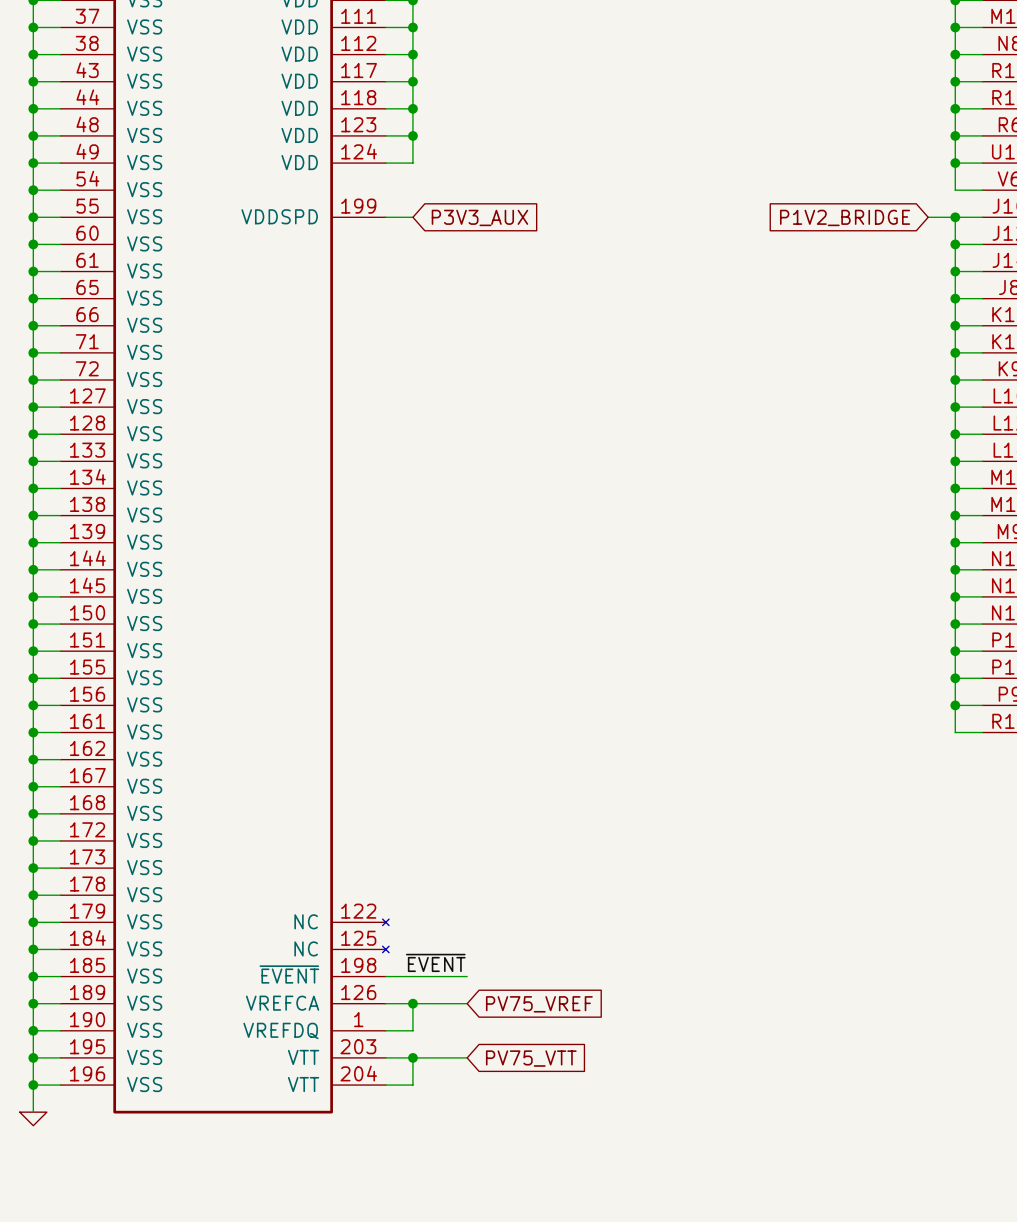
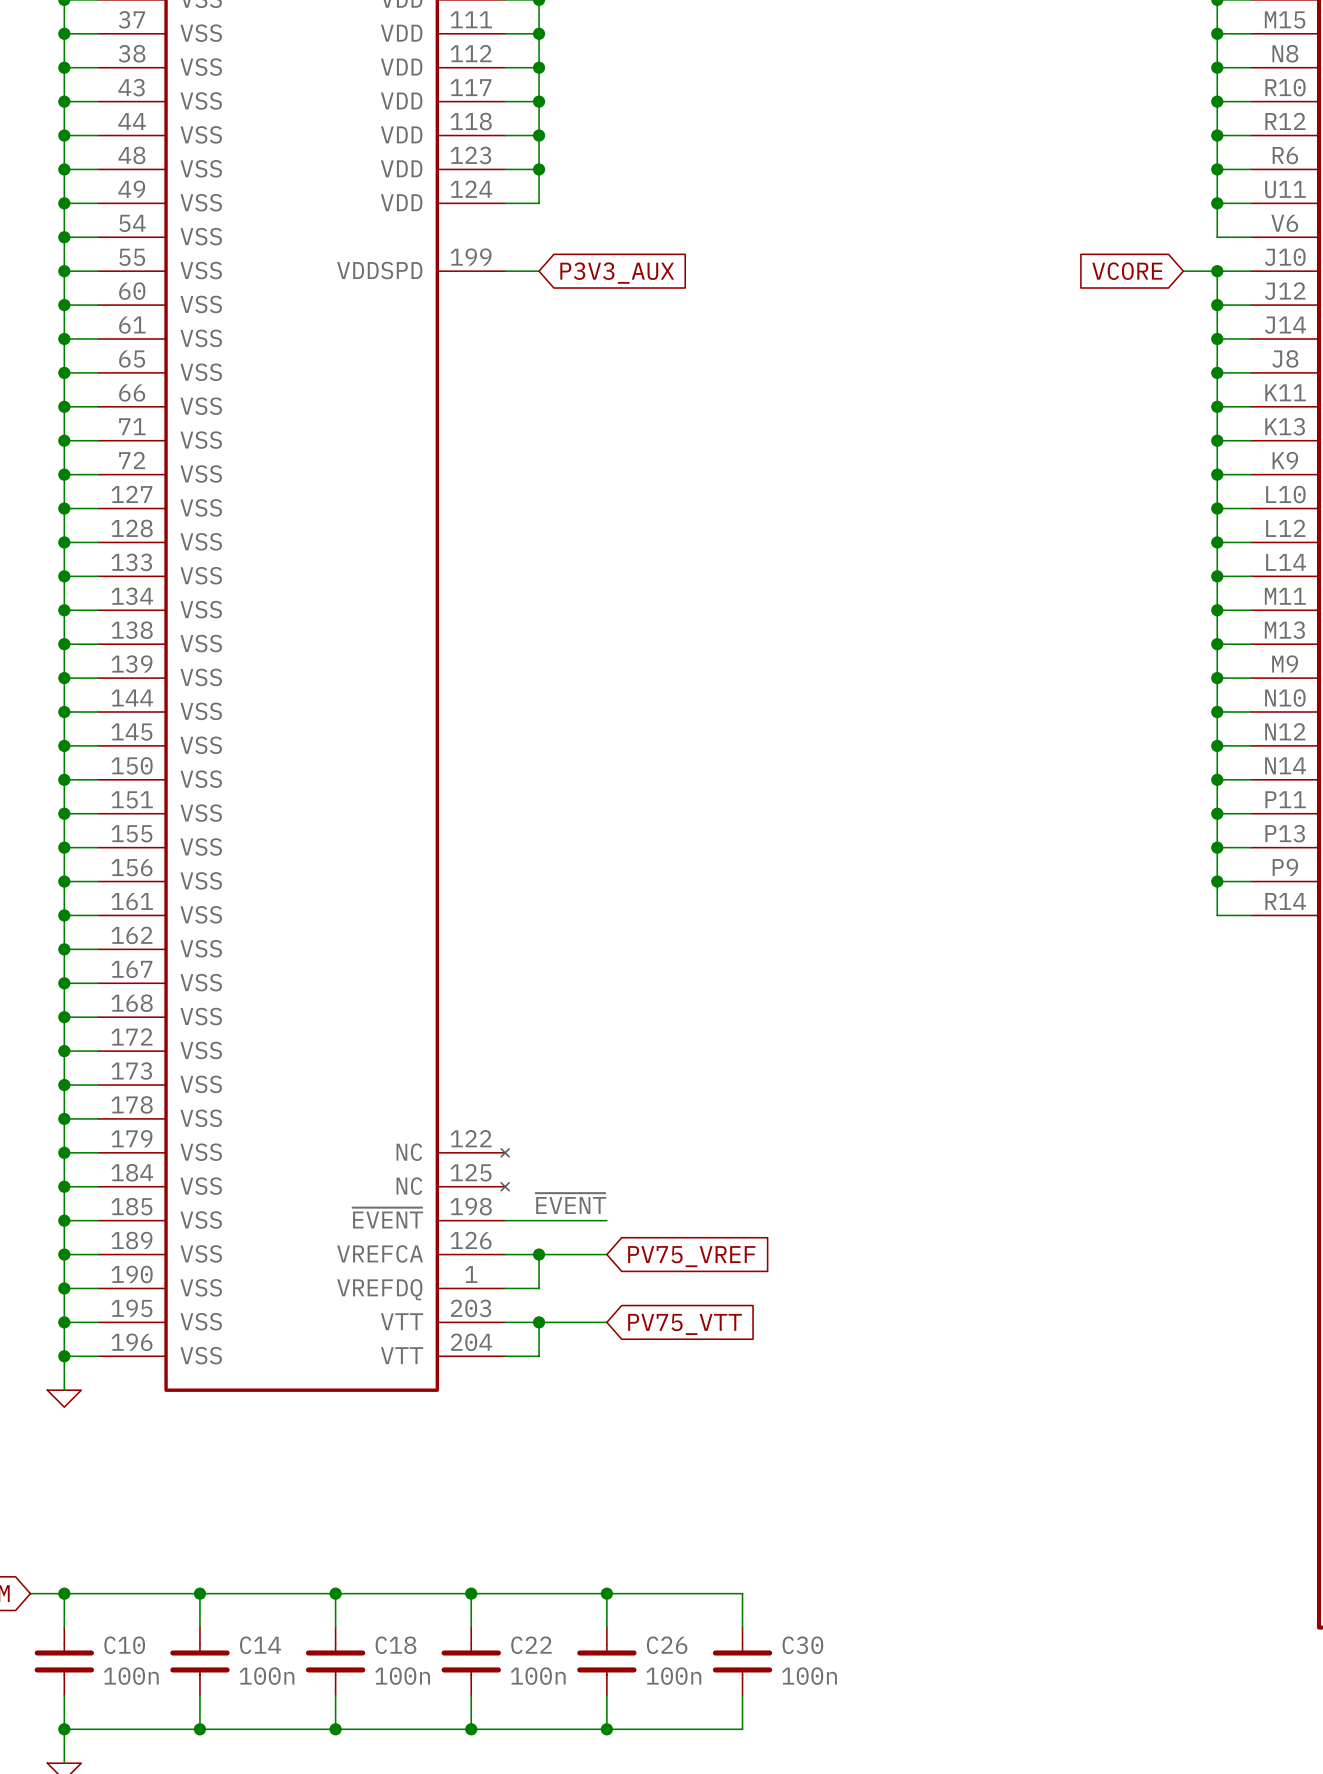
global label: P1V2_BRIDGE (845, 217) -> VCORE (1127, 271)

